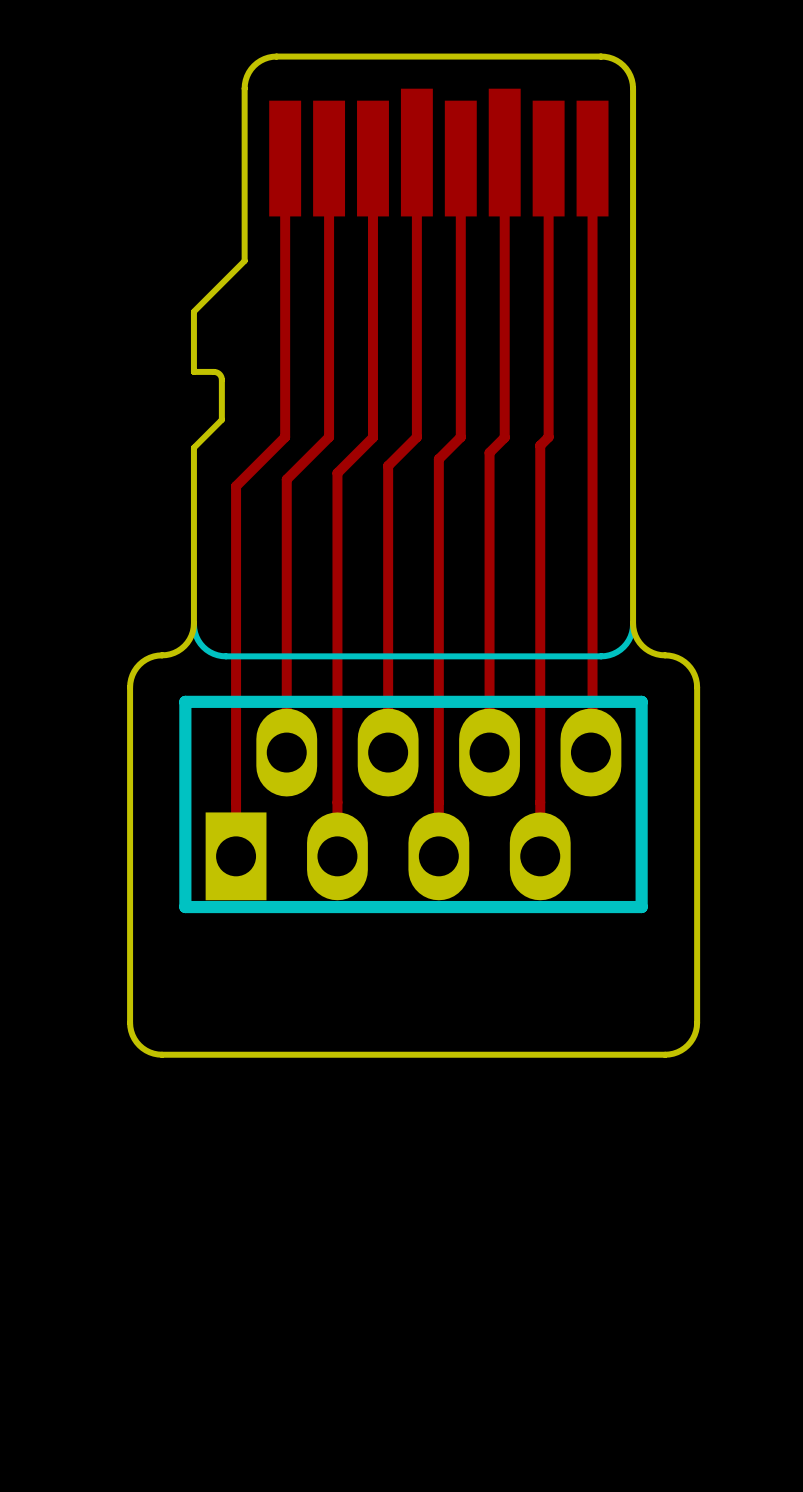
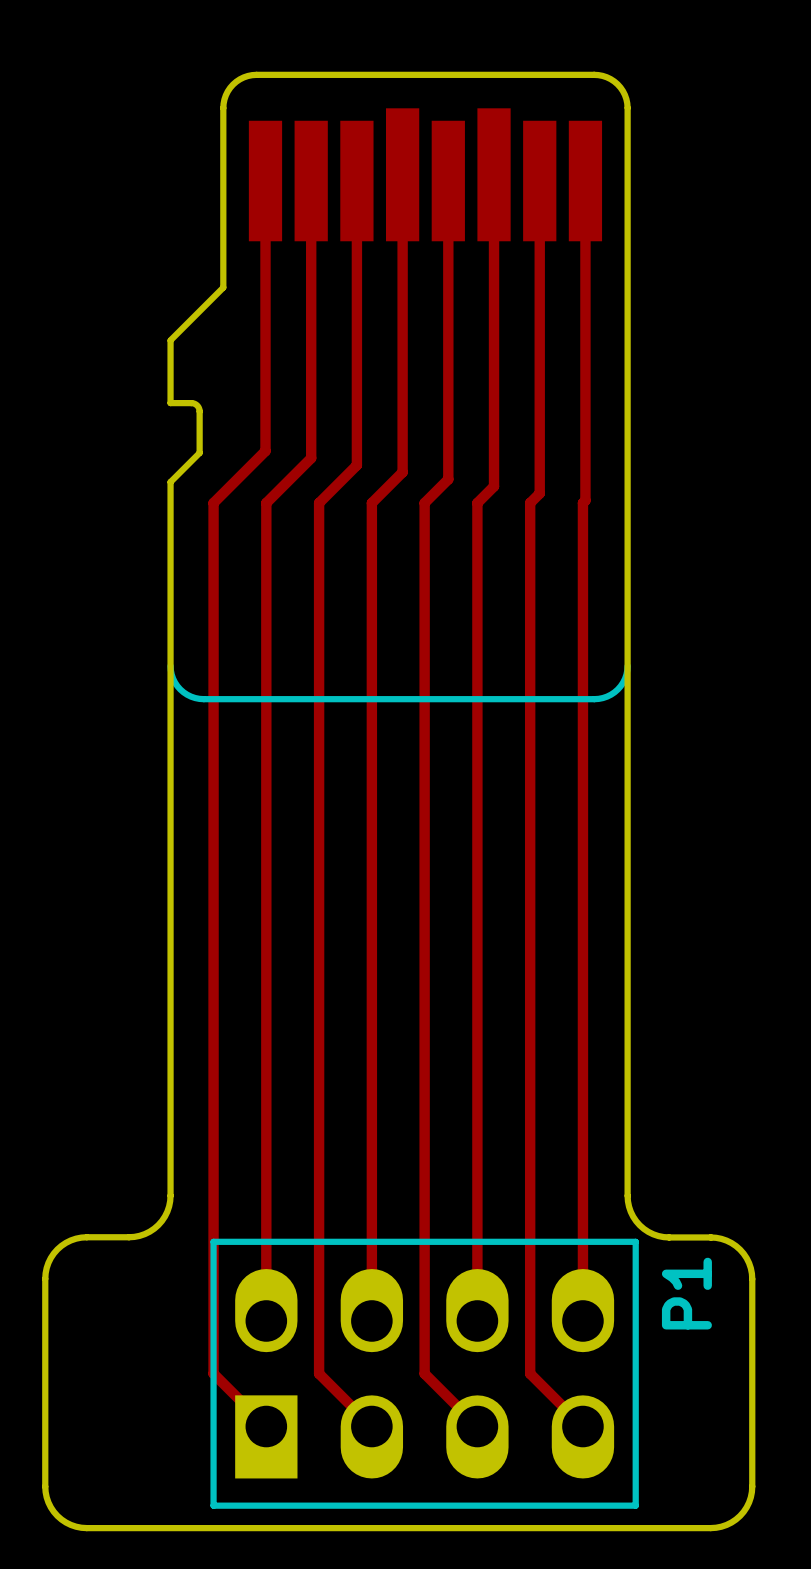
top track: (285, 418) (285, 437) (236, 486) (236, 856) -> (265, 451) (213, 503) (213, 1373) (266, 1426)
top track: (329, 424) (329, 437) (286, 479) (286, 752) -> (311, 458) (266, 503) (266, 1320)
top track: (372, 431) (372, 437) (337, 473) (337, 856) -> (356, 465) (319, 503) (319, 1373) (371, 1426)
top track: (416, 437) (388, 465) (388, 752) -> (402, 471) (371, 503) (371, 1320)
top track: (460, 437) (438, 459) (438, 856) -> (448, 471) (448, 479) (424, 503) (424, 1373) (477, 1426)
top track: (504, 437) (489, 452) (489, 752) -> (494, 471) (494, 486) (477, 503) (477, 1320)
top track: (548, 437) (540, 445) (540, 856) -> (539, 471) (539, 493) (530, 503) (530, 1373) (582, 1426)
top track: (592, 465) (592, 750) (590, 752) -> (585, 500) (582, 503) (582, 1320)
board edge: (193, 623) (191, 635) (184, 646) (174, 652) (153, 656) (142, 661) (134, 671) (130, 683) (130, 1022) -> (170, 664) (170, 1201) (161, 1220) (149, 1231) (134, 1236) (76, 1238) (57, 1249) (48, 1262) (45, 1278) (45, 1486) (48, 1502) (57, 1515) (70, 1524) (86, 1528) (710, 1528) (726, 1524) (743, 1511) (751, 1491) (752, 1279) (749, 1263) (740, 1249) (726, 1240) (710, 1237)
board edge: (633, 623) (635, 635) (642, 646) (652, 652) (664, 655) -> (627, 664) (627, 1201) (636, 1221) (653, 1234) (669, 1237) (711, 1237)
board edge: (665, 655) (677, 657) (687, 664) (694, 675) (697, 687) (697, 1022) (694, 1035) (684, 1048) (673, 1053) (665, 1054) (162, 1054) (149, 1052) (139, 1045) (132, 1035) (130, 1022) -> none
part: (413, 804) -> none
P1: none -> (424, 1373)

